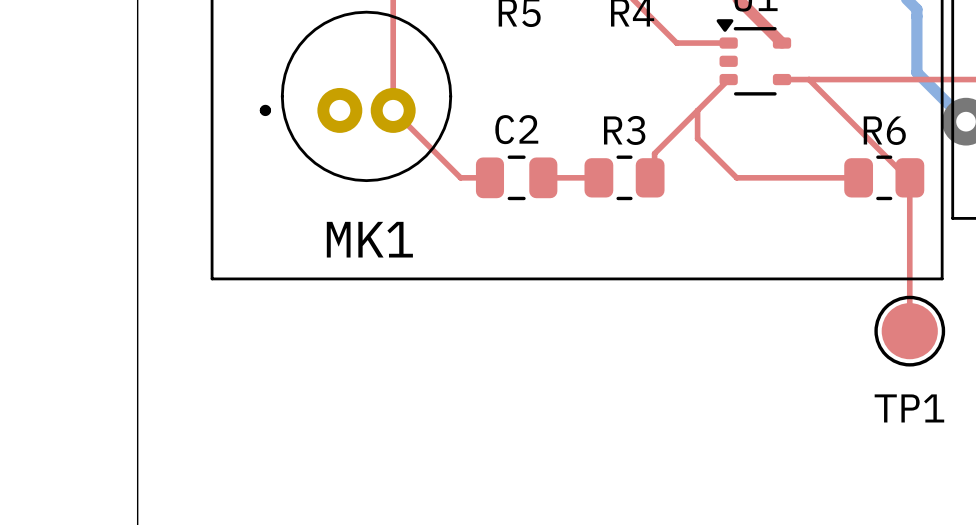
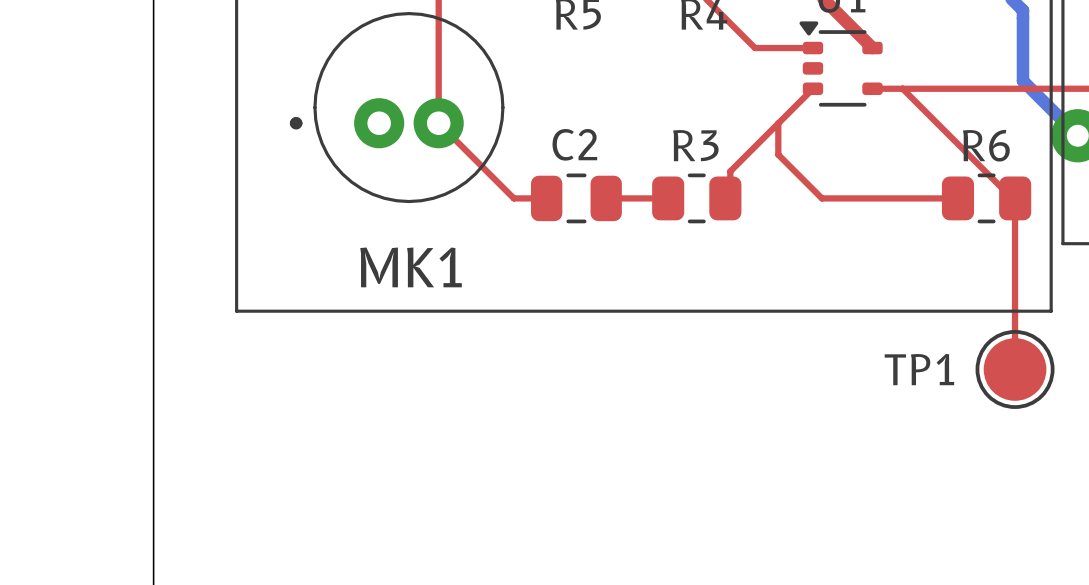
TP1 name position: TP1 (909, 408) -> TP1 (919, 369)

